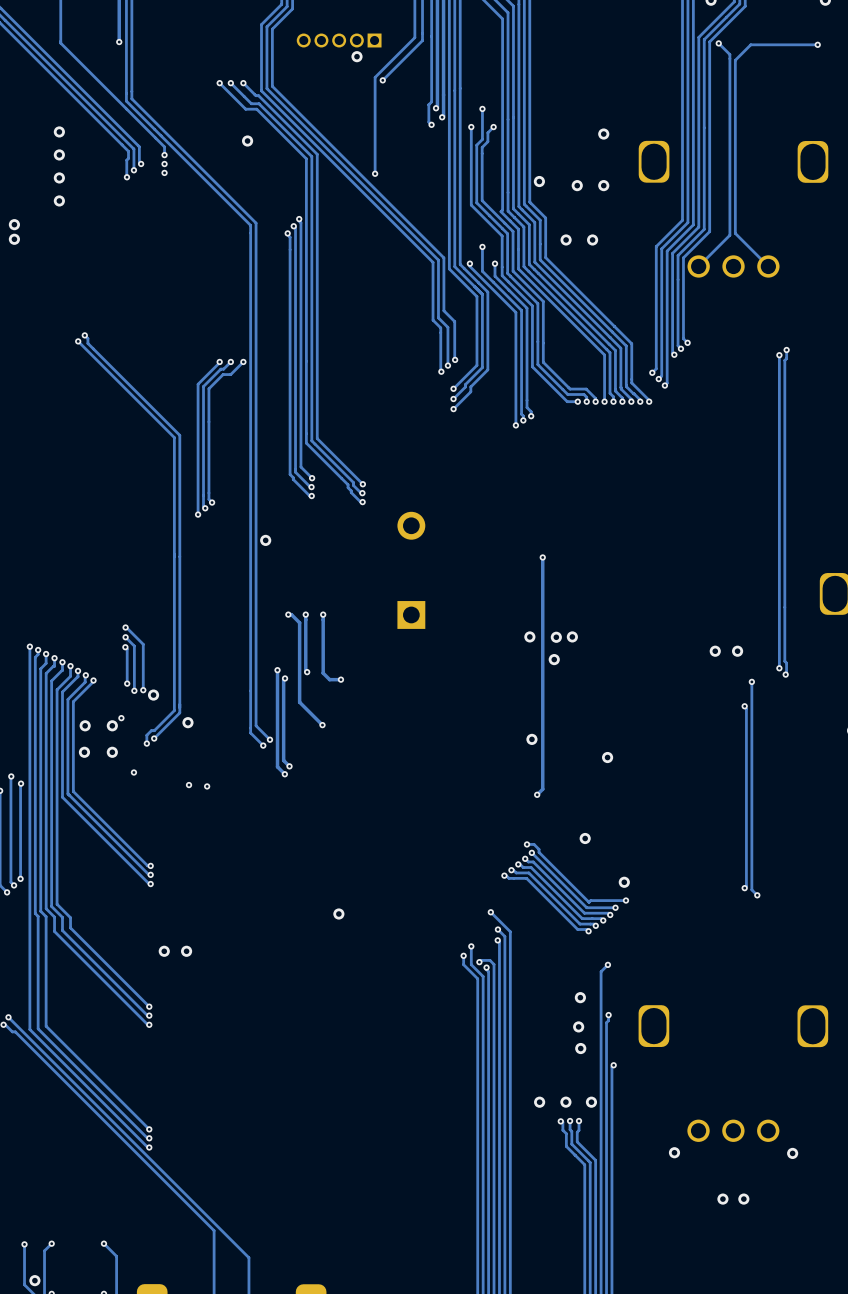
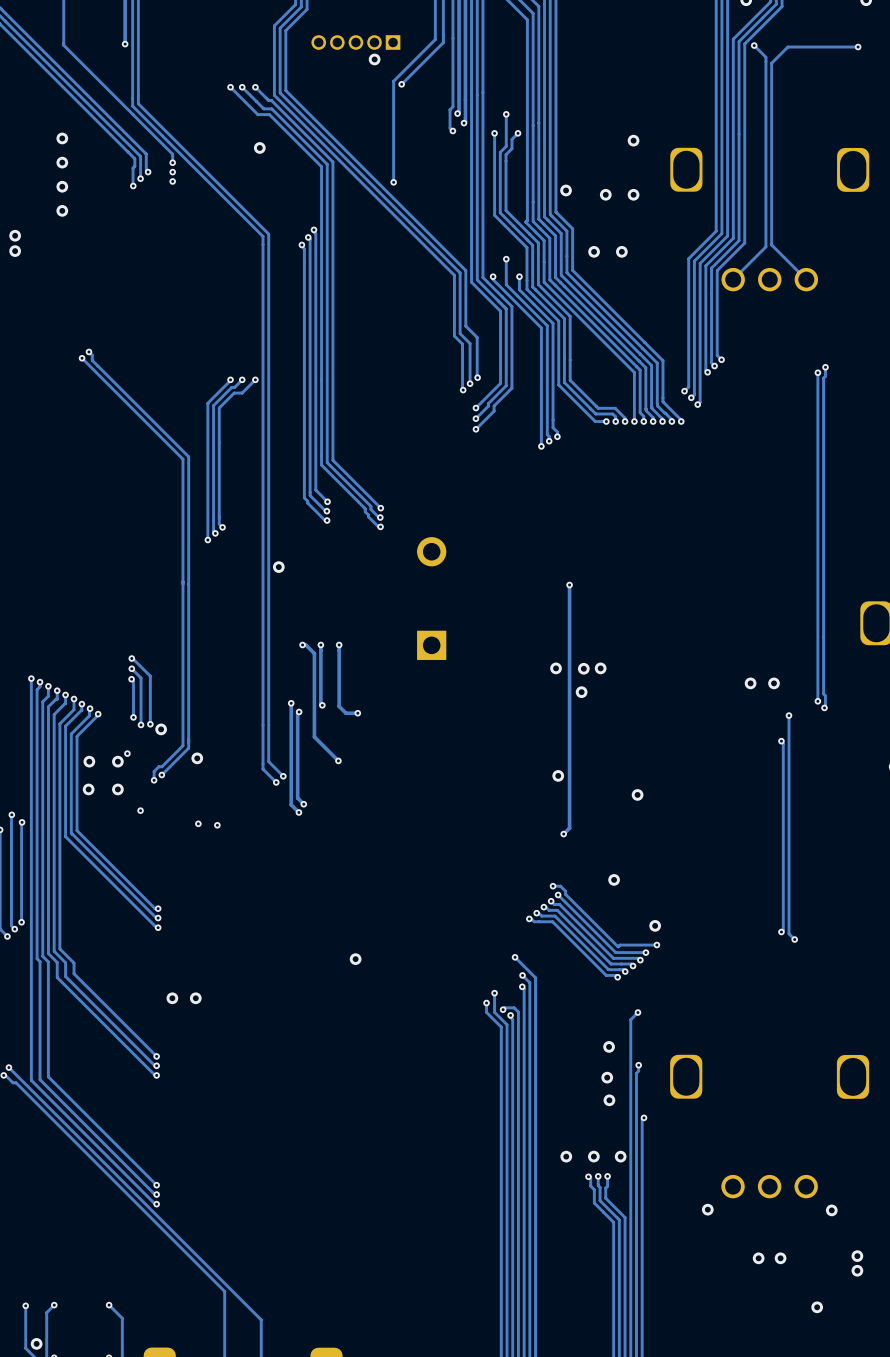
via: none -> (857, 1256)
via: none -> (857, 1270)
via: none -> (817, 1307)

